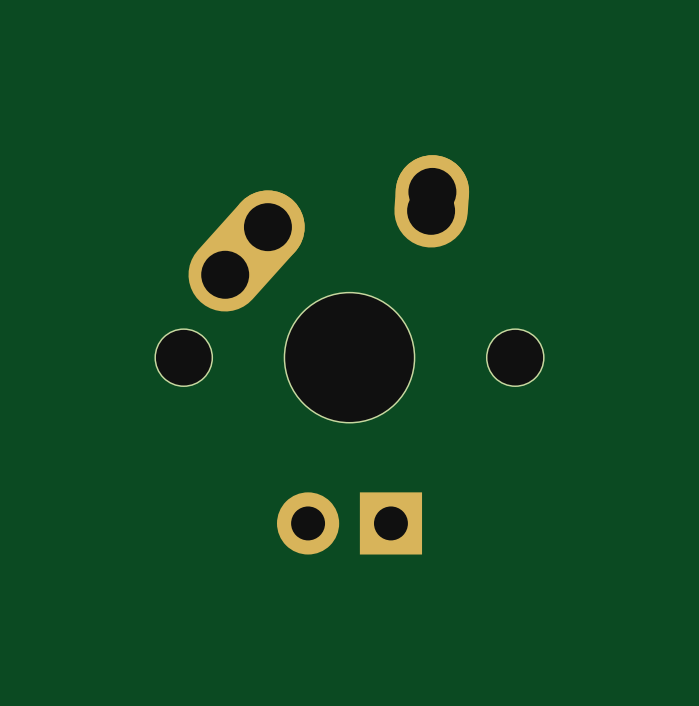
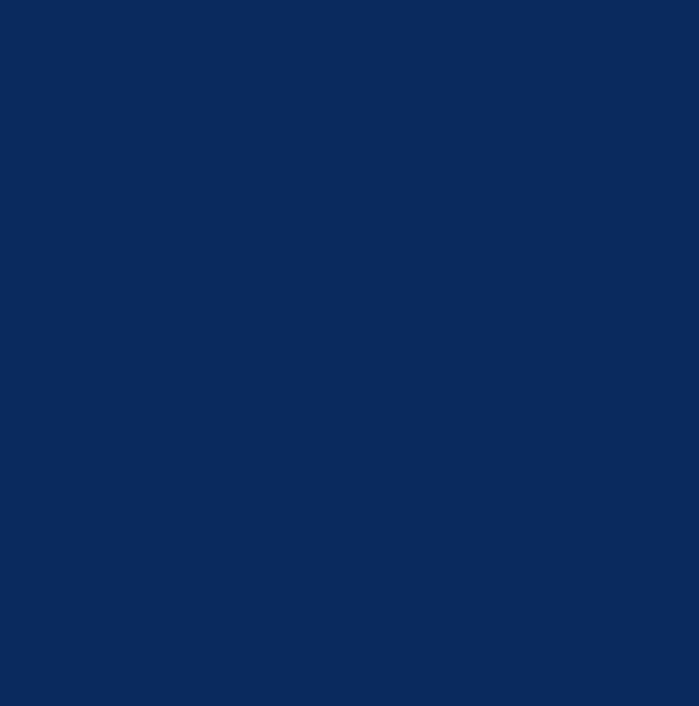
part: (349, 354) -> none

